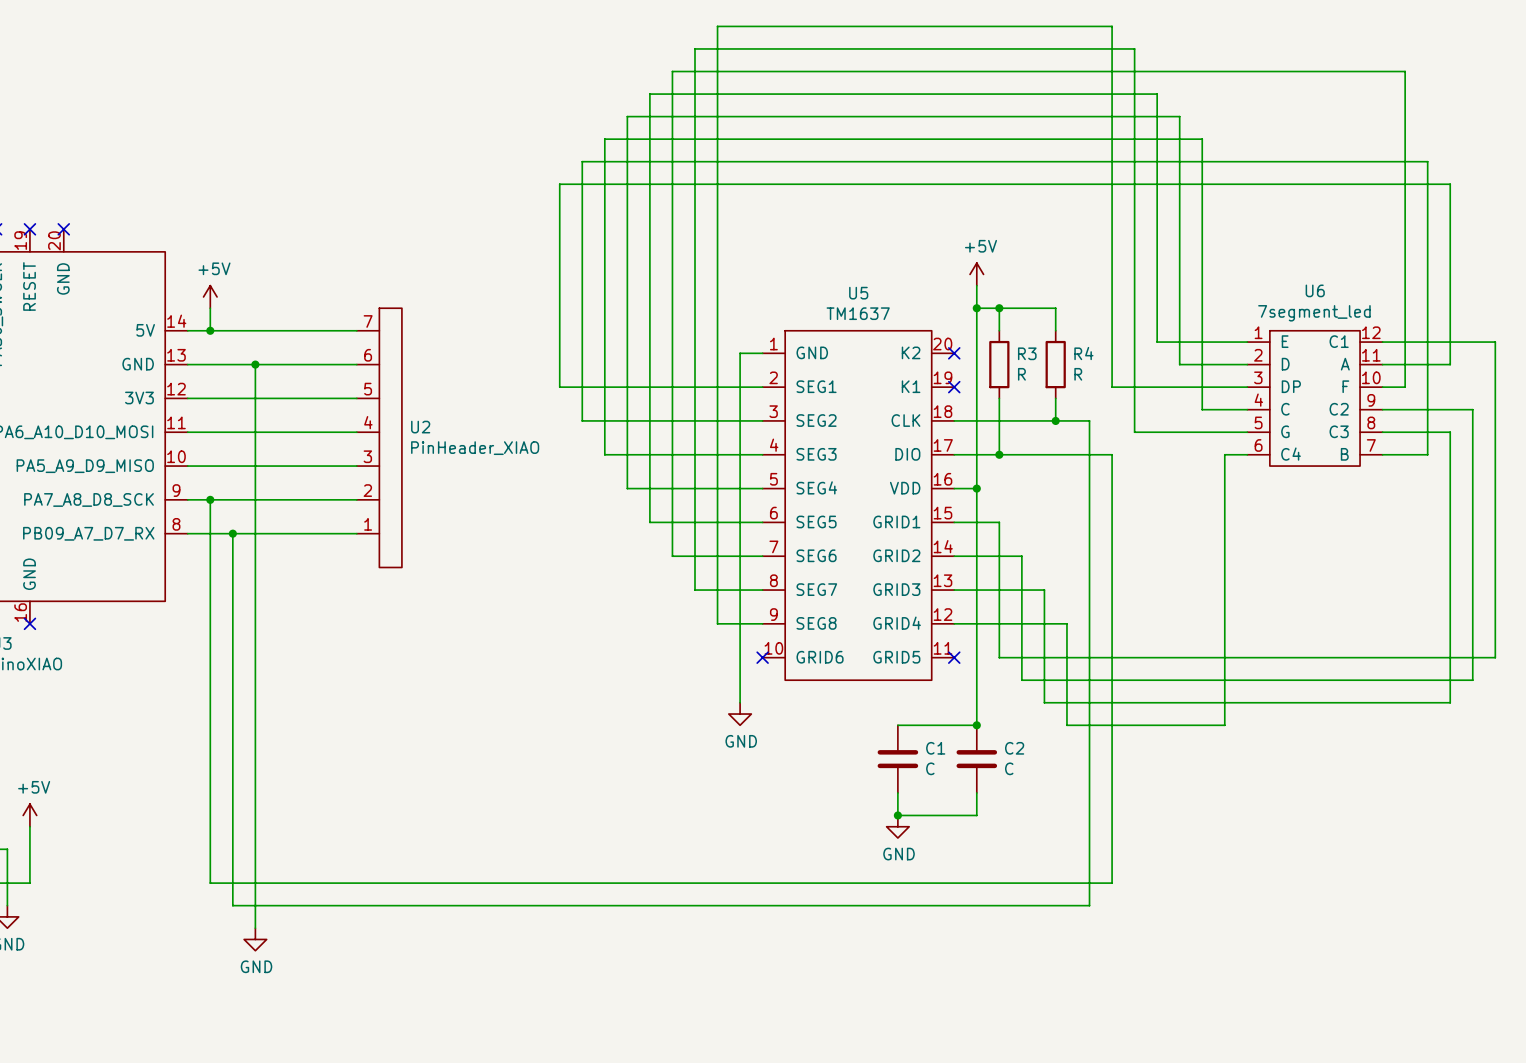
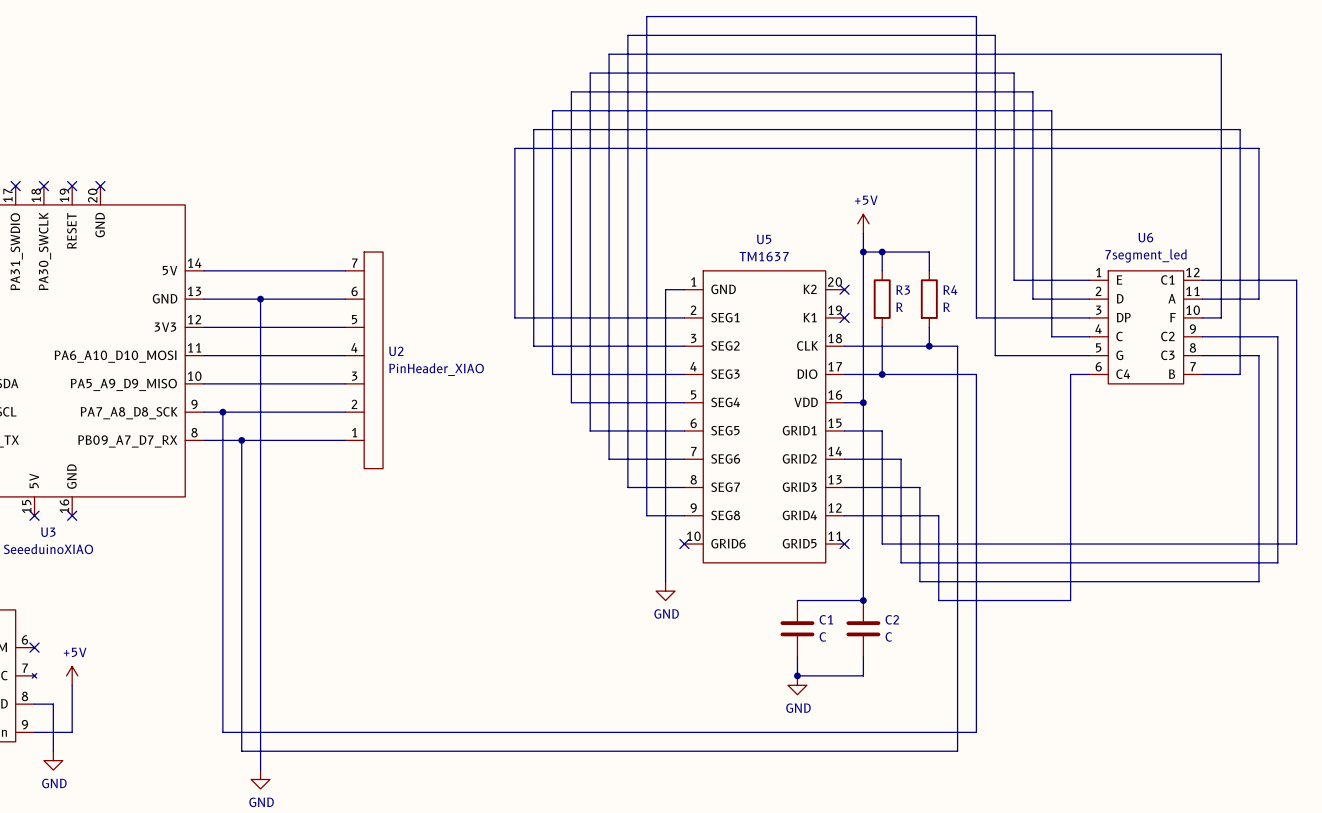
power symbol: +5V (210, 296) -> none
wire: (210, 308) (210, 330) -> none
junction: (210, 330) -> none

